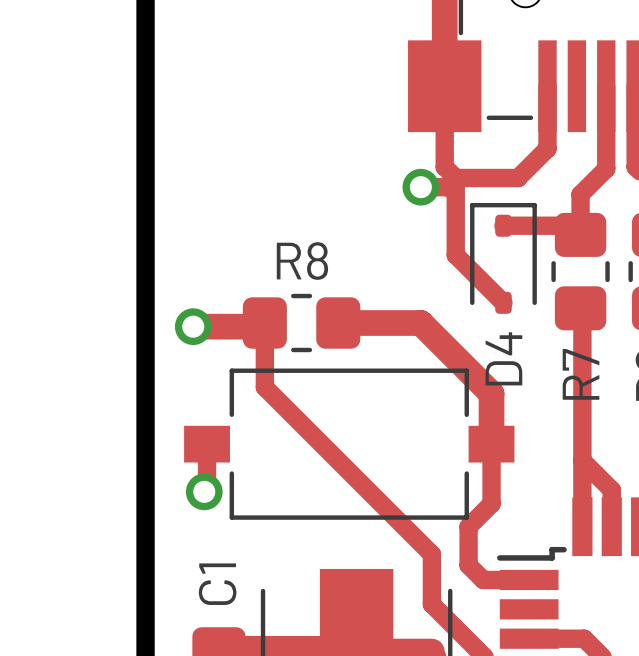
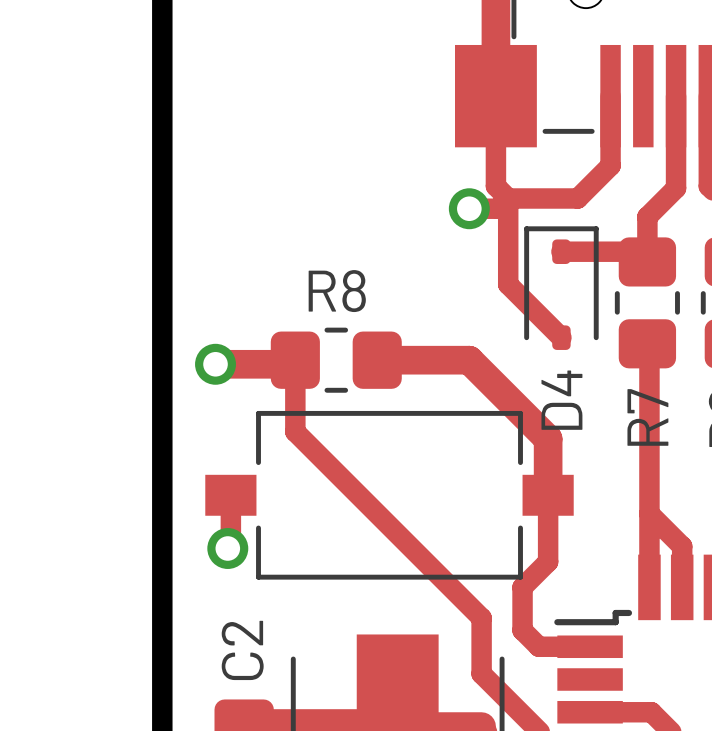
C1 name: C1 (217, 584) -> C2 (242, 650)

